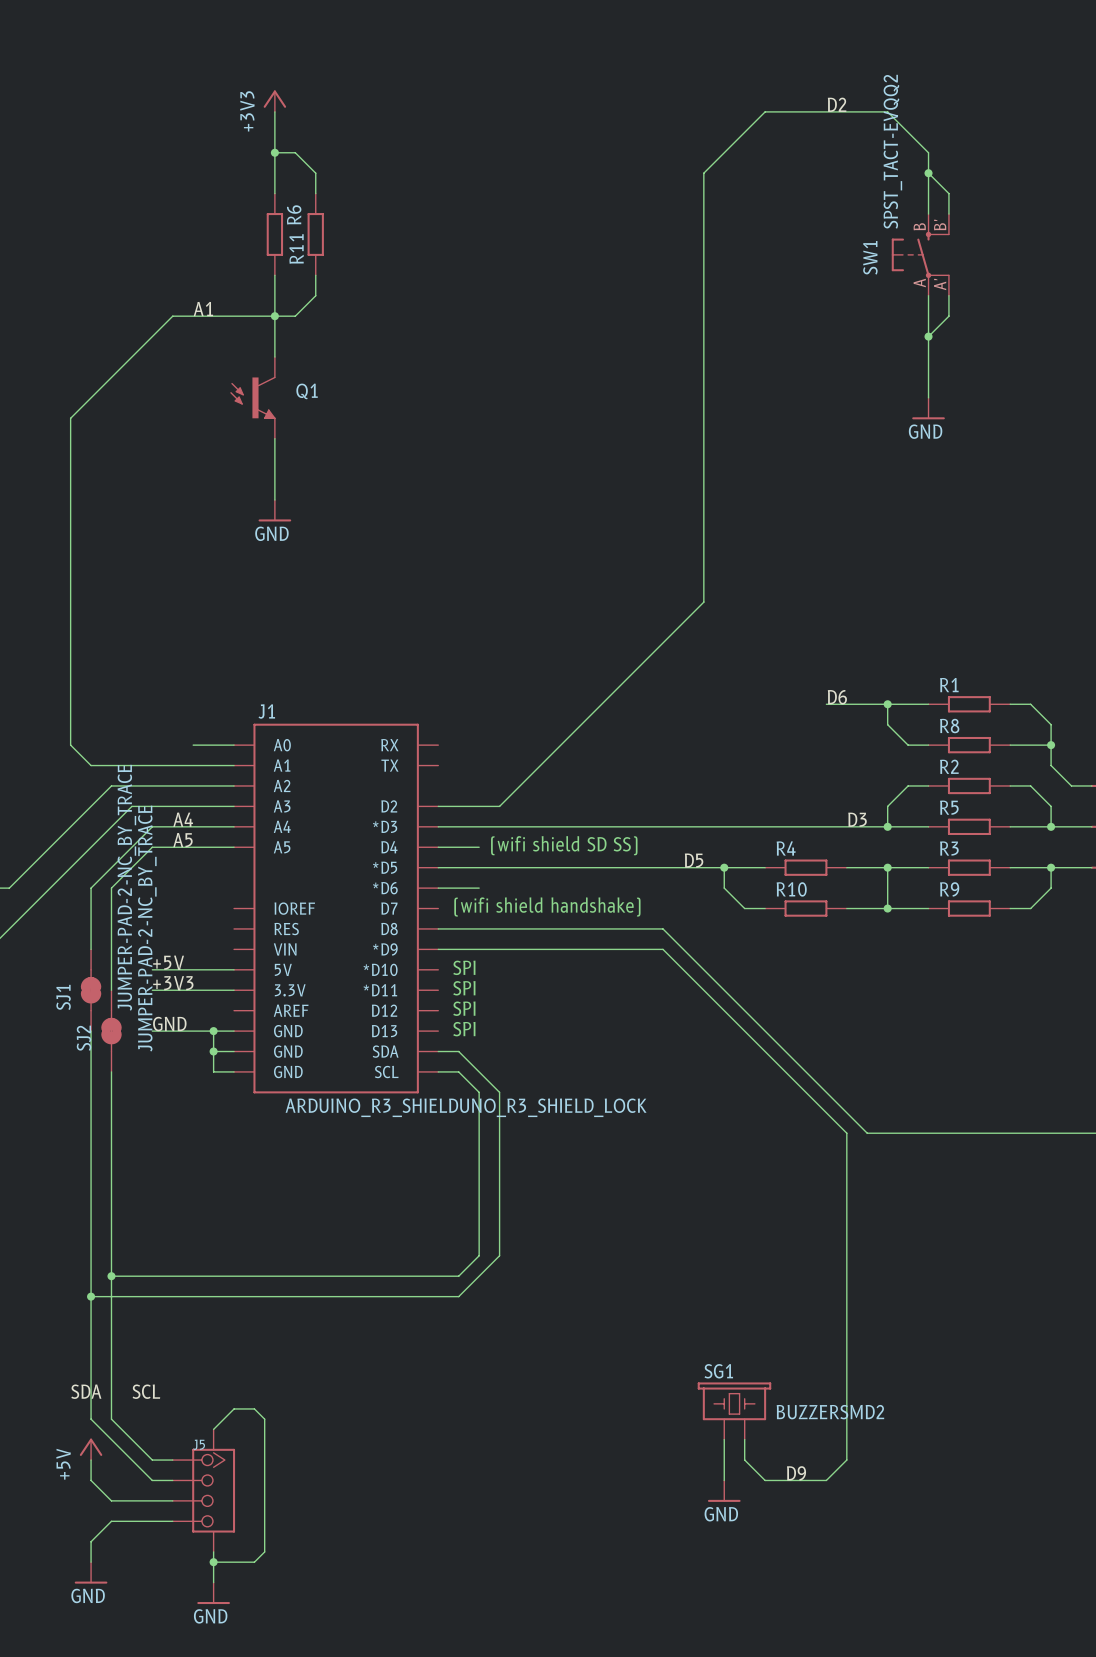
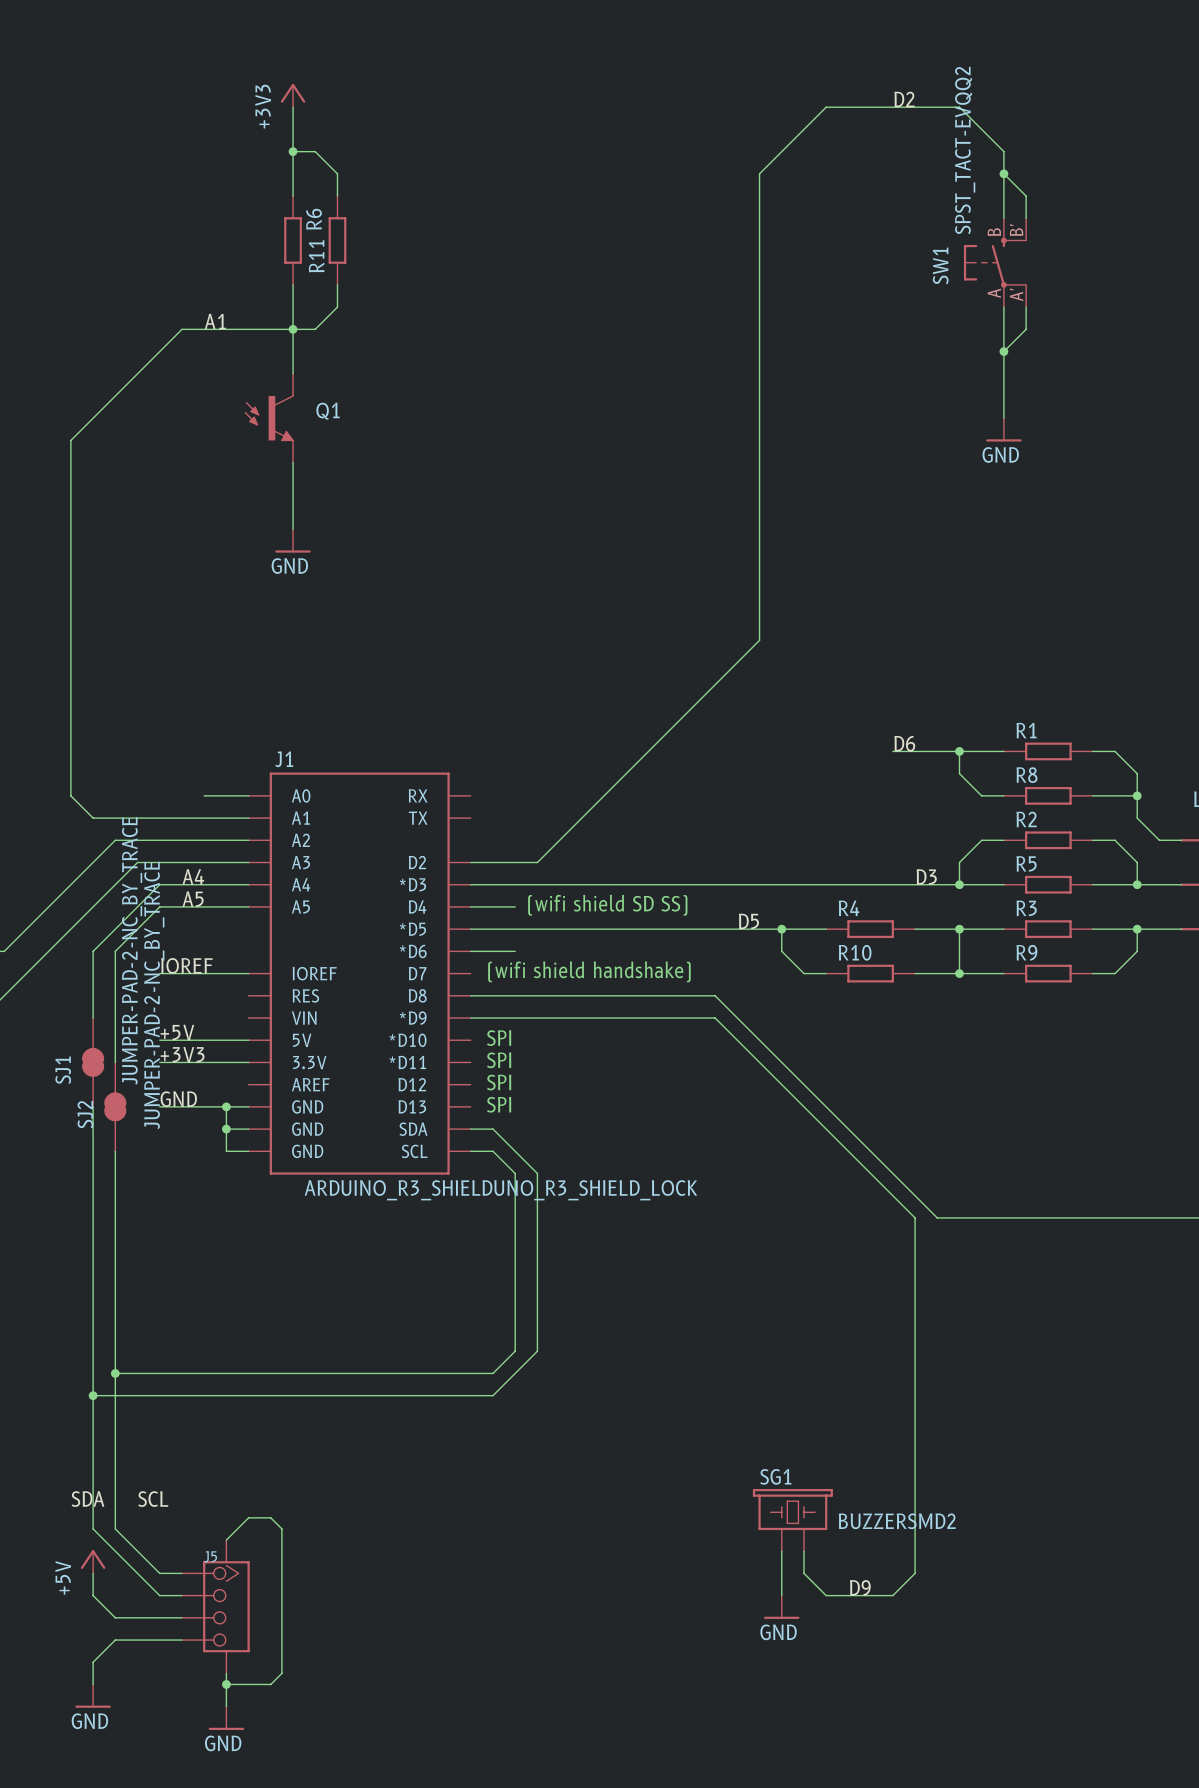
label: none -> IOREF (186, 965)
wire: none -> (159, 973) (248, 973)

